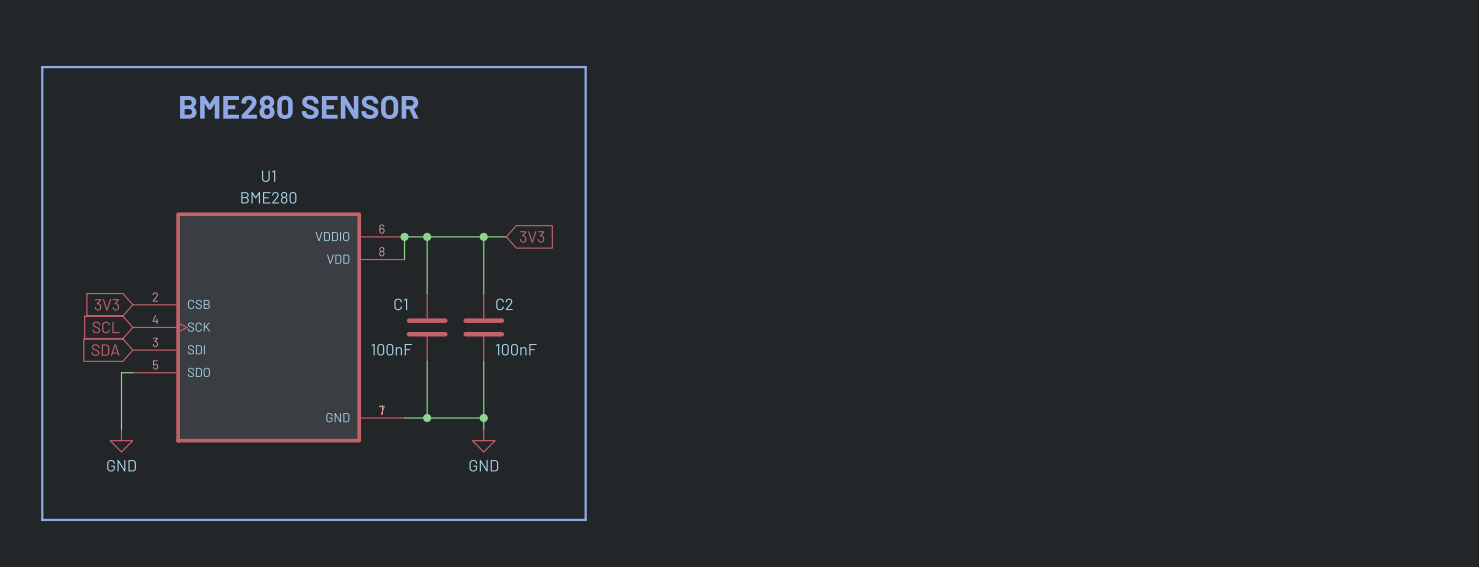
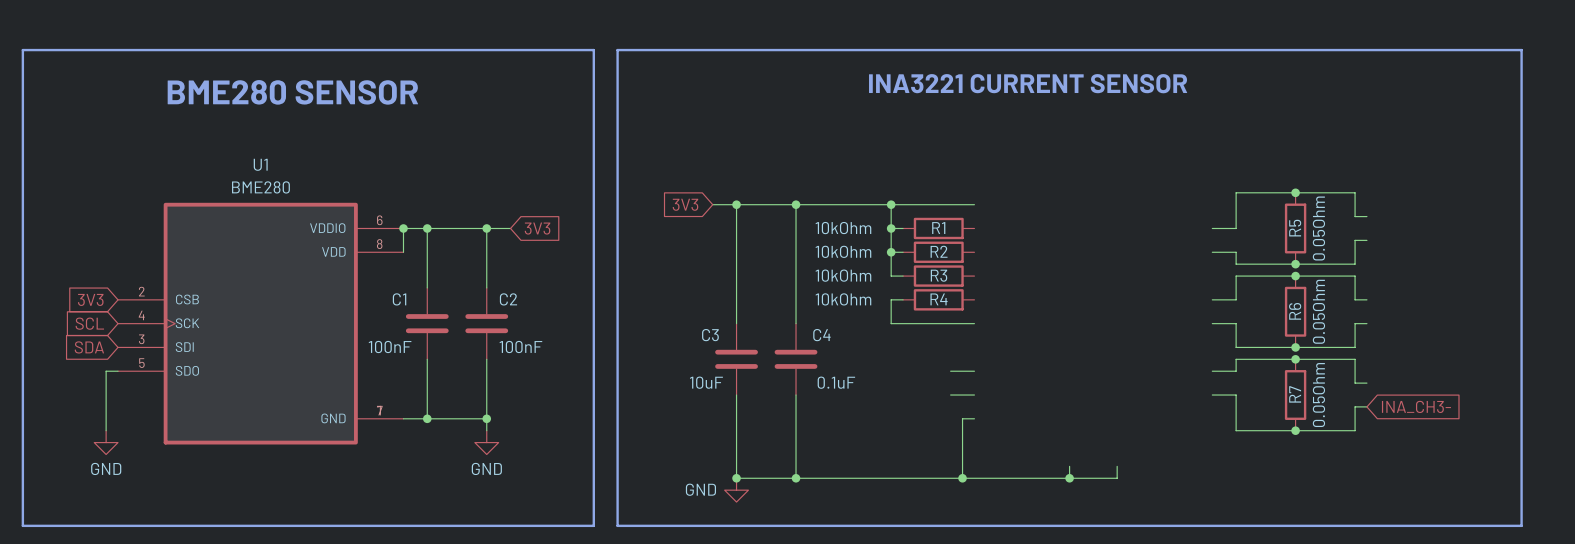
line: none -> (617, 50) (1521, 50) (1521, 525) (617, 525) (617, 50)
text: none -> INA3221 CURRENT SENSOR (1028, 83)
junction: none -> (1295, 192)
global label: none -> 3V3 (685, 204)
wire: none -> (712, 204) (974, 204)
wire: none -> (736, 204) (736, 323)
junction: none -> (736, 204)
wire: none -> (796, 204) (796, 323)
junction: none -> (796, 204)
wire: none -> (891, 204) (891, 276) (903, 276)
junction: none -> (891, 204)
wire: none -> (1366, 216) (1355, 216) (1355, 192) (1236, 192) (1236, 228) (1212, 228)
wire: none -> (891, 228) (903, 228)
junction: none -> (891, 228)
R1: none -> 10kOhm (938, 228)
R5: none -> 0.05Ohm (1295, 228)
wire: none -> (1366, 240) (1355, 240) (1355, 264) (1236, 264) (1236, 252) (1212, 252)
wire: none -> (891, 252) (903, 252)
junction: none -> (891, 252)
R2: none -> 10kOhm (938, 252)
junction: none -> (1295, 264)
R3: none -> 10kOhm (938, 276)
junction: none -> (1295, 276)
wire: none -> (903, 299) (891, 299) (891, 323) (974, 323)
R4: none -> 10kOhm (938, 299)
wire: none -> (1212, 299) (1236, 299) (1236, 276) (1355, 276) (1355, 299) (1366, 299)
R6: none -> 0.05Ohm (1295, 311)
wire: none -> (1212, 323) (1236, 323) (1236, 347) (1355, 347) (1355, 323) (1366, 323)
junction: none -> (1295, 347)
C3: none -> 10uF (736, 359)
C4: none -> 0.1uF (796, 359)
junction: none -> (1295, 359)
wire: none -> (950, 371) (974, 371)
wire: none -> (1212, 371) (1236, 371) (1236, 359) (1355, 359) (1355, 383) (1366, 383)
wire: none -> (736, 395) (736, 478) (1117, 478) (1117, 466)
wire: none -> (796, 395) (796, 478)
wire: none -> (950, 395) (974, 395)
wire: none -> (1212, 395) (1236, 395) (1236, 430) (1355, 430) (1355, 406) (1366, 406)
R7: none -> 0.05Ohm (1295, 395)
global label: none -> INA_CH3- (1416, 406)
wire: none -> (974, 418) (962, 418) (962, 478)
junction: none -> (1295, 430)
wire: none -> (1069, 466) (1069, 478)
junction: none -> (736, 478)
junction: none -> (796, 478)
junction: none -> (962, 478)
junction: none -> (1069, 478)
power symbol: none -> GND (736, 490)

